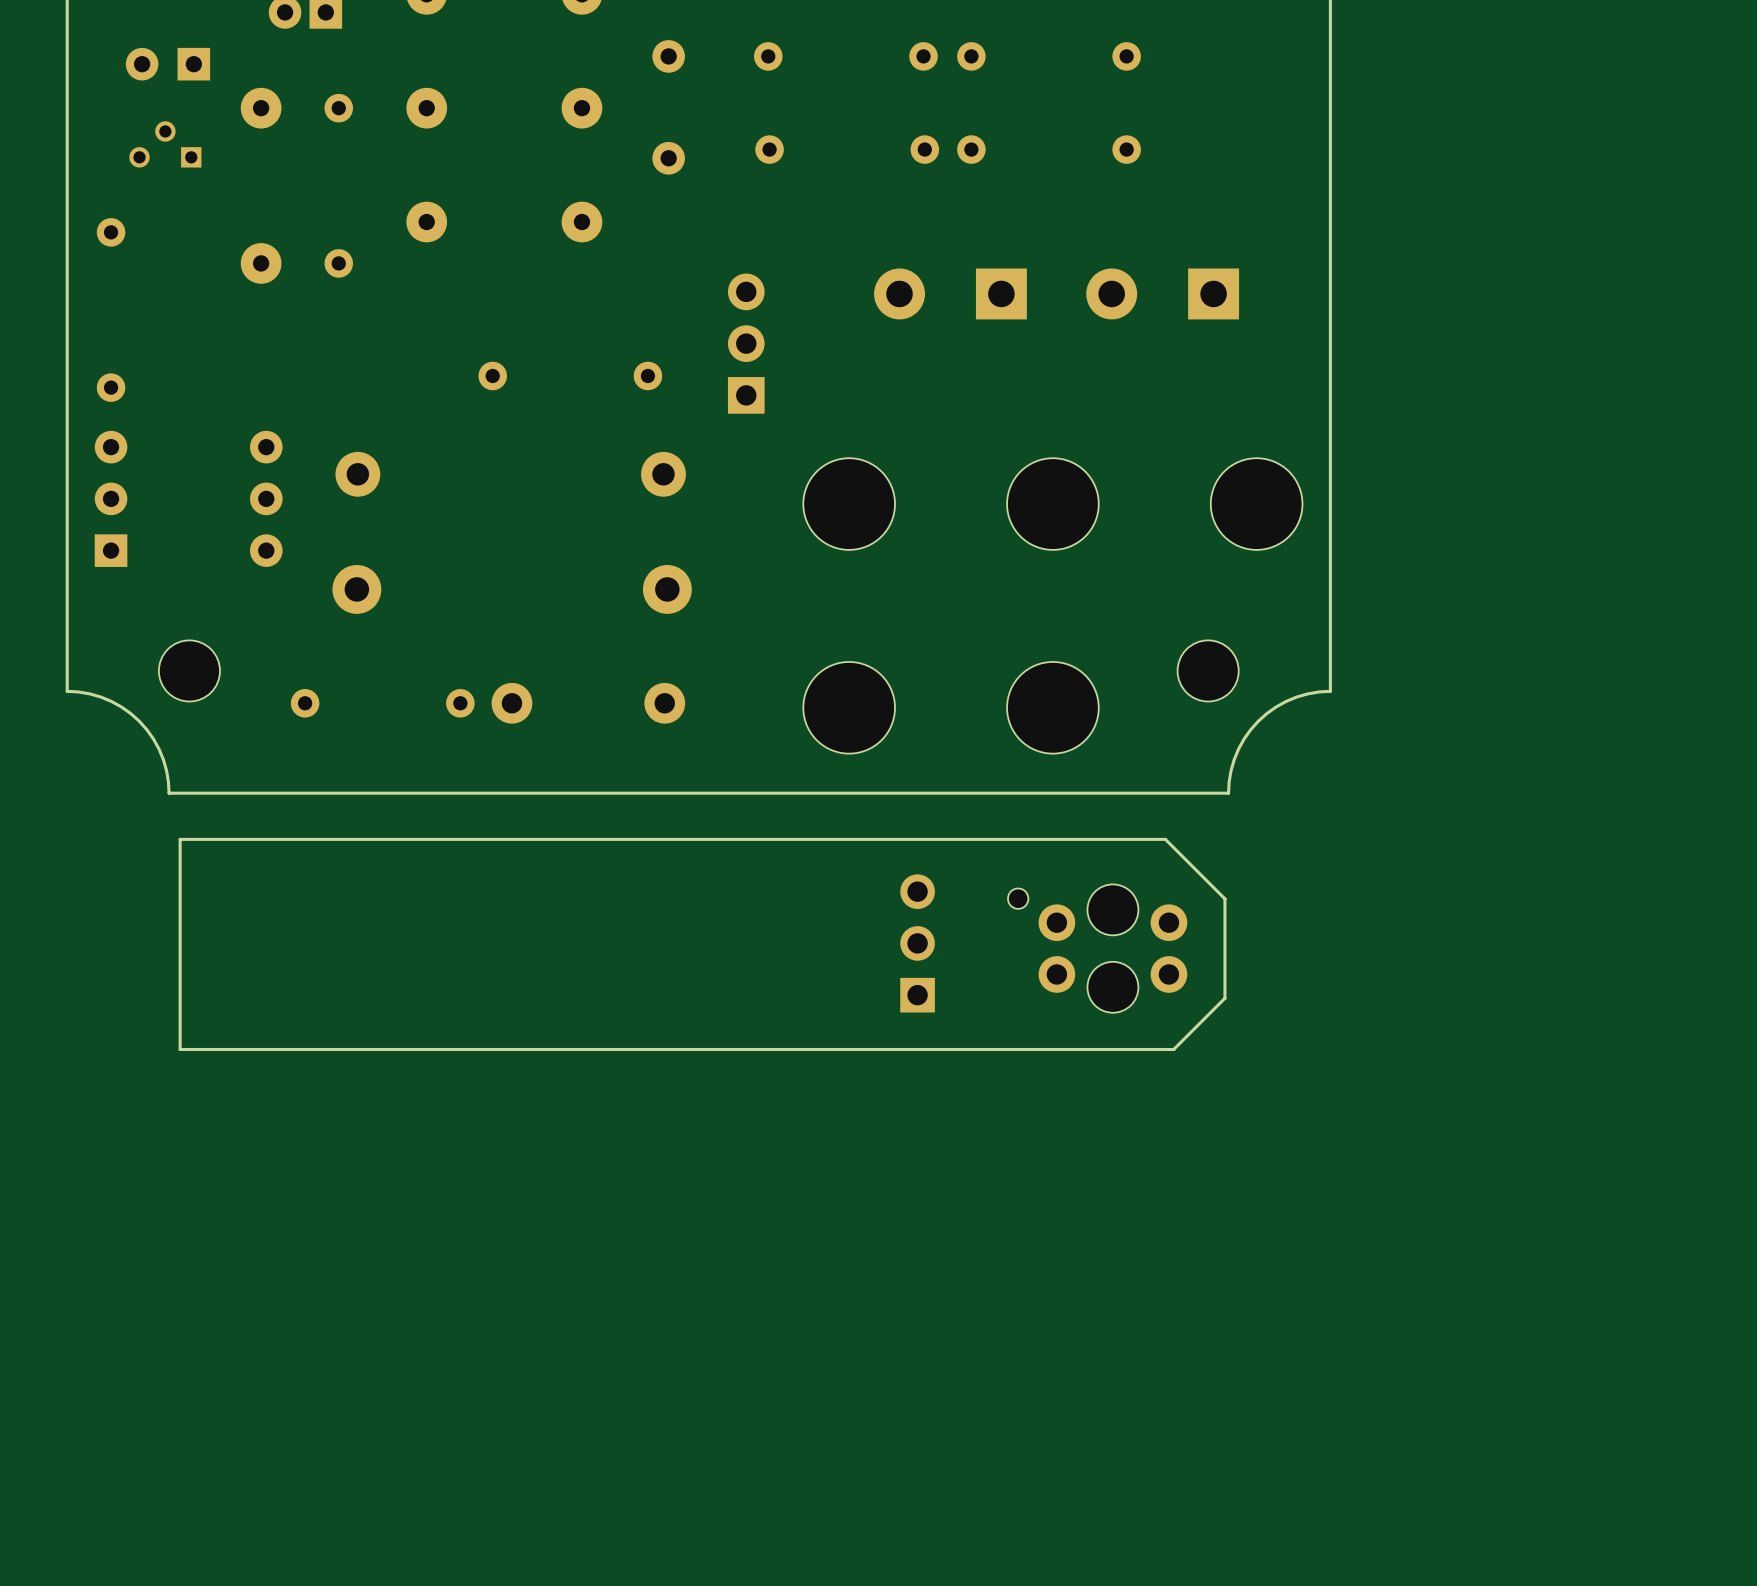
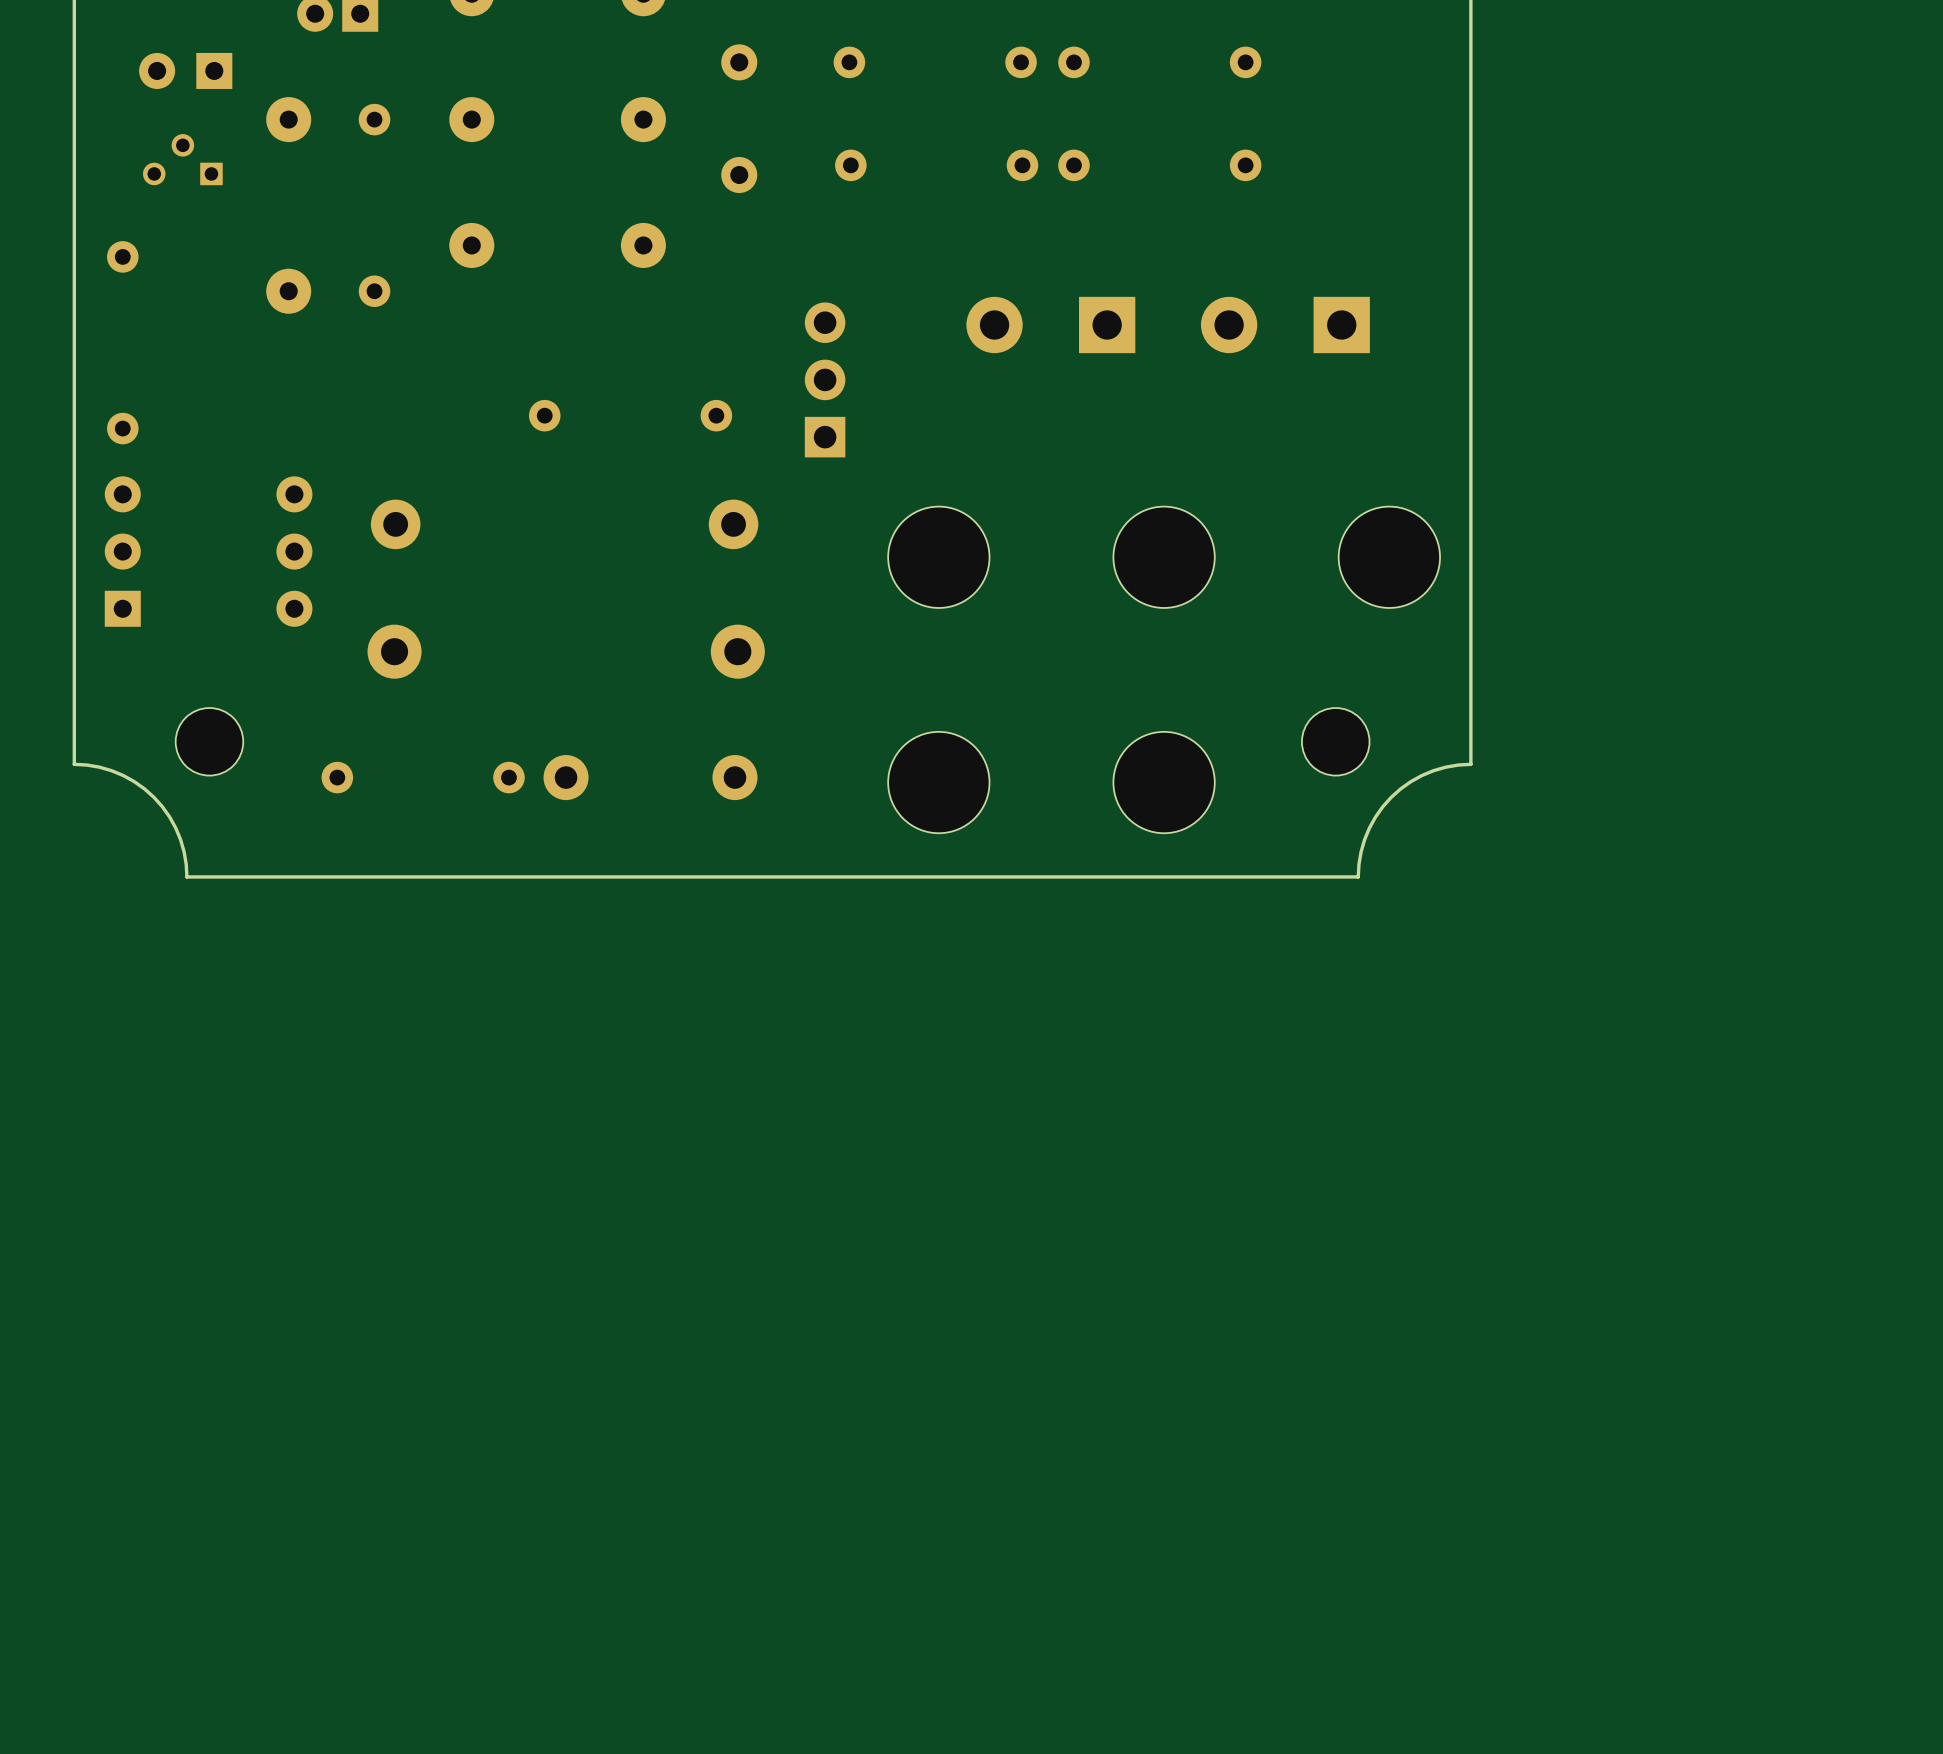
board edge: (1165, 839) (180, 839) (180, 1049) (1173, 1049) (1224, 998) (1224, 898) (1165, 839) -> none
part: (917, 943) -> none
part: (1097, 948) -> none

